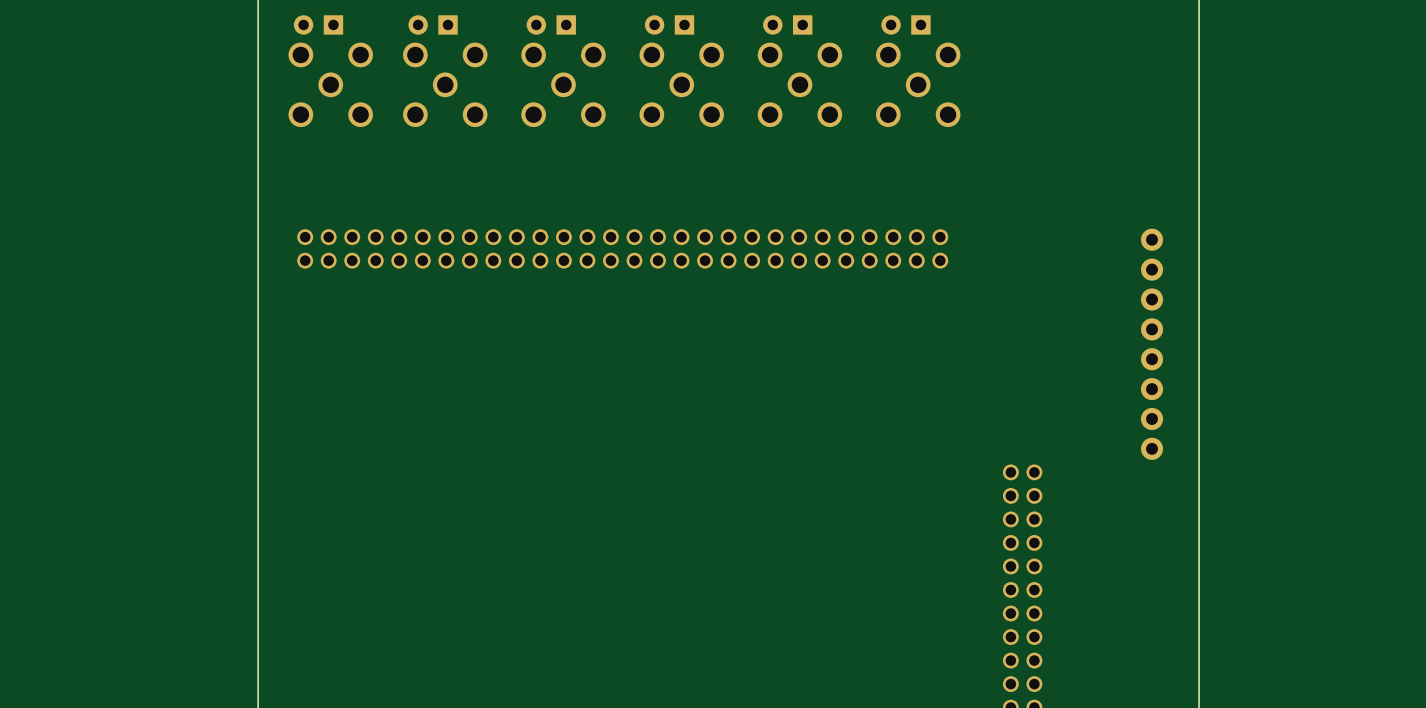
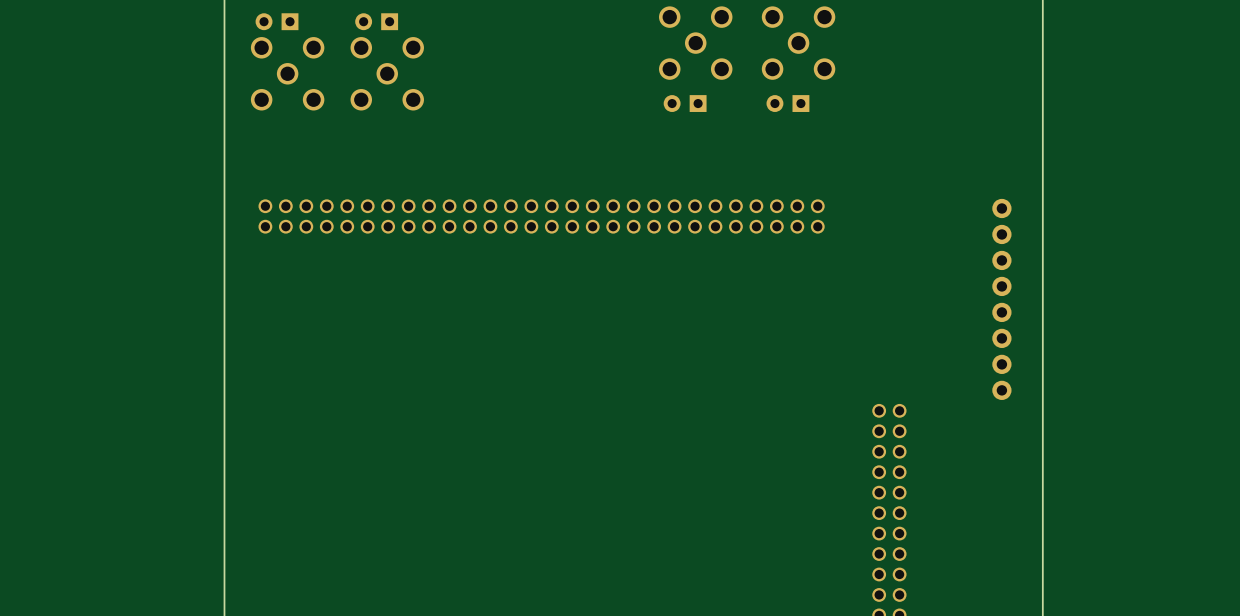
part: (551, 24) -> none
part: (669, 24) -> none
part: (787, 24) -> none
part: (905, 24) -> none
part: (563, 84) -> none
part: (681, 84) -> none
part position: (799, 84) -> (695, 43)
part position: (918, 84) -> (798, 43)
part: none -> (685, 103)
part: none -> (787, 103)

